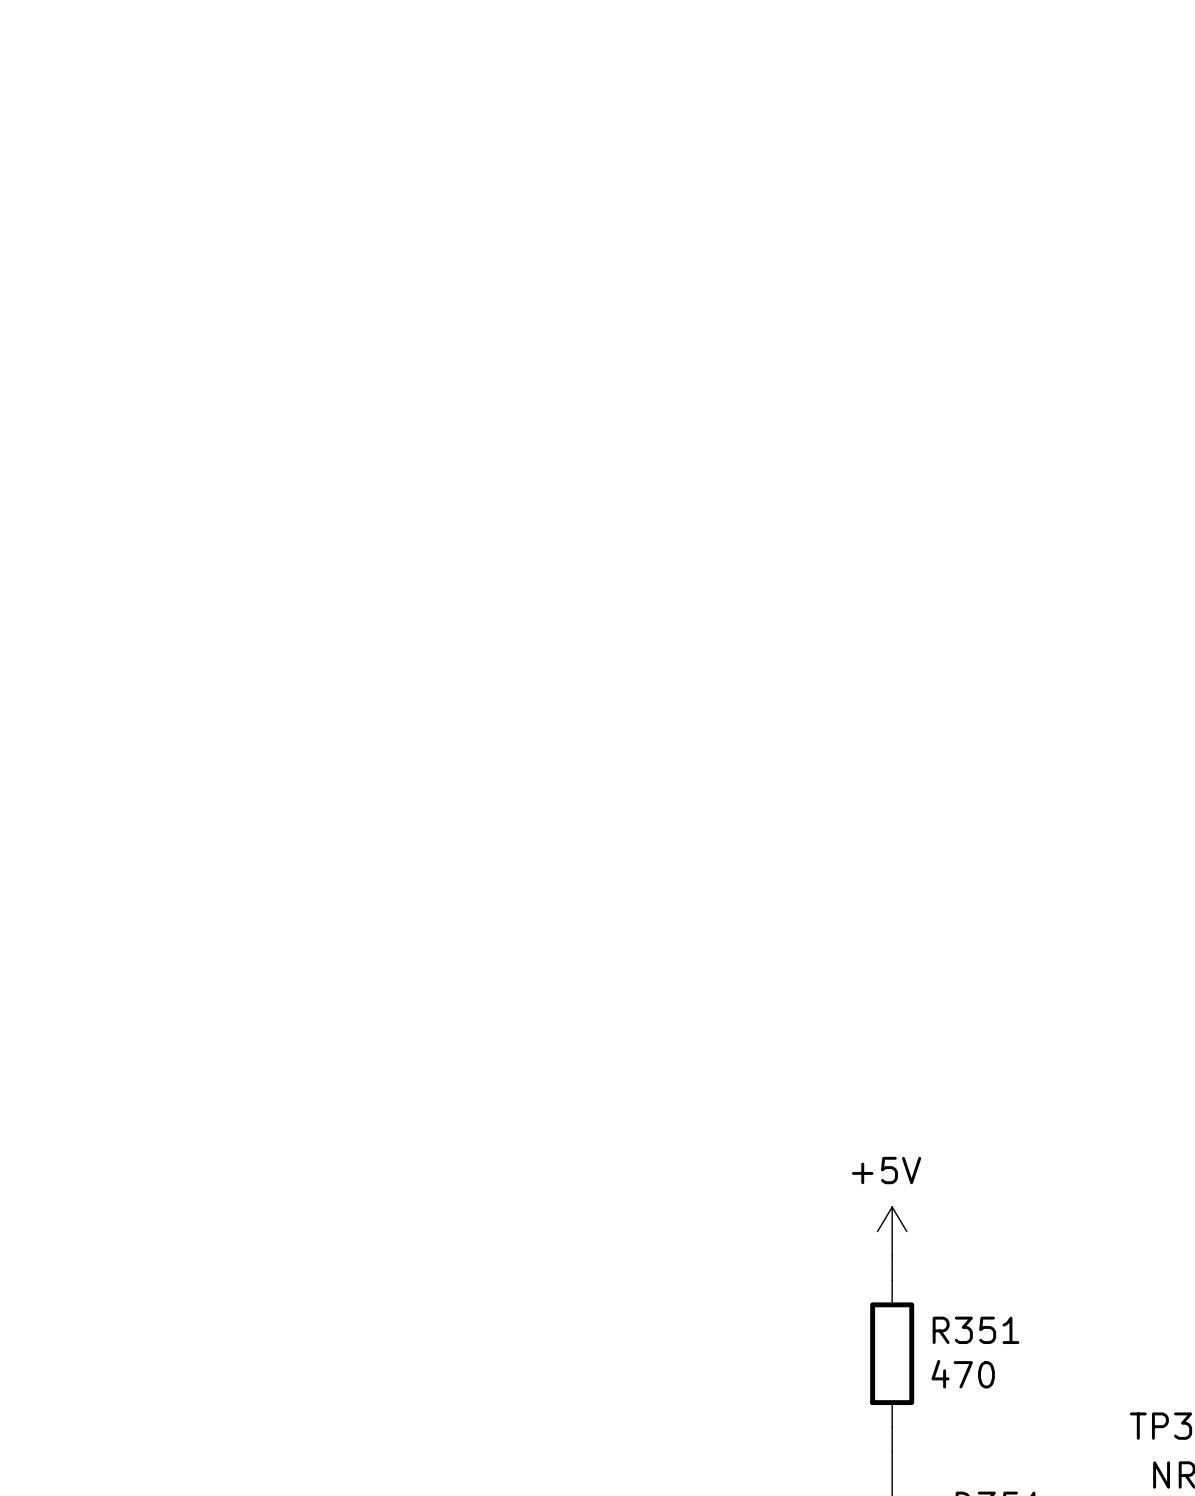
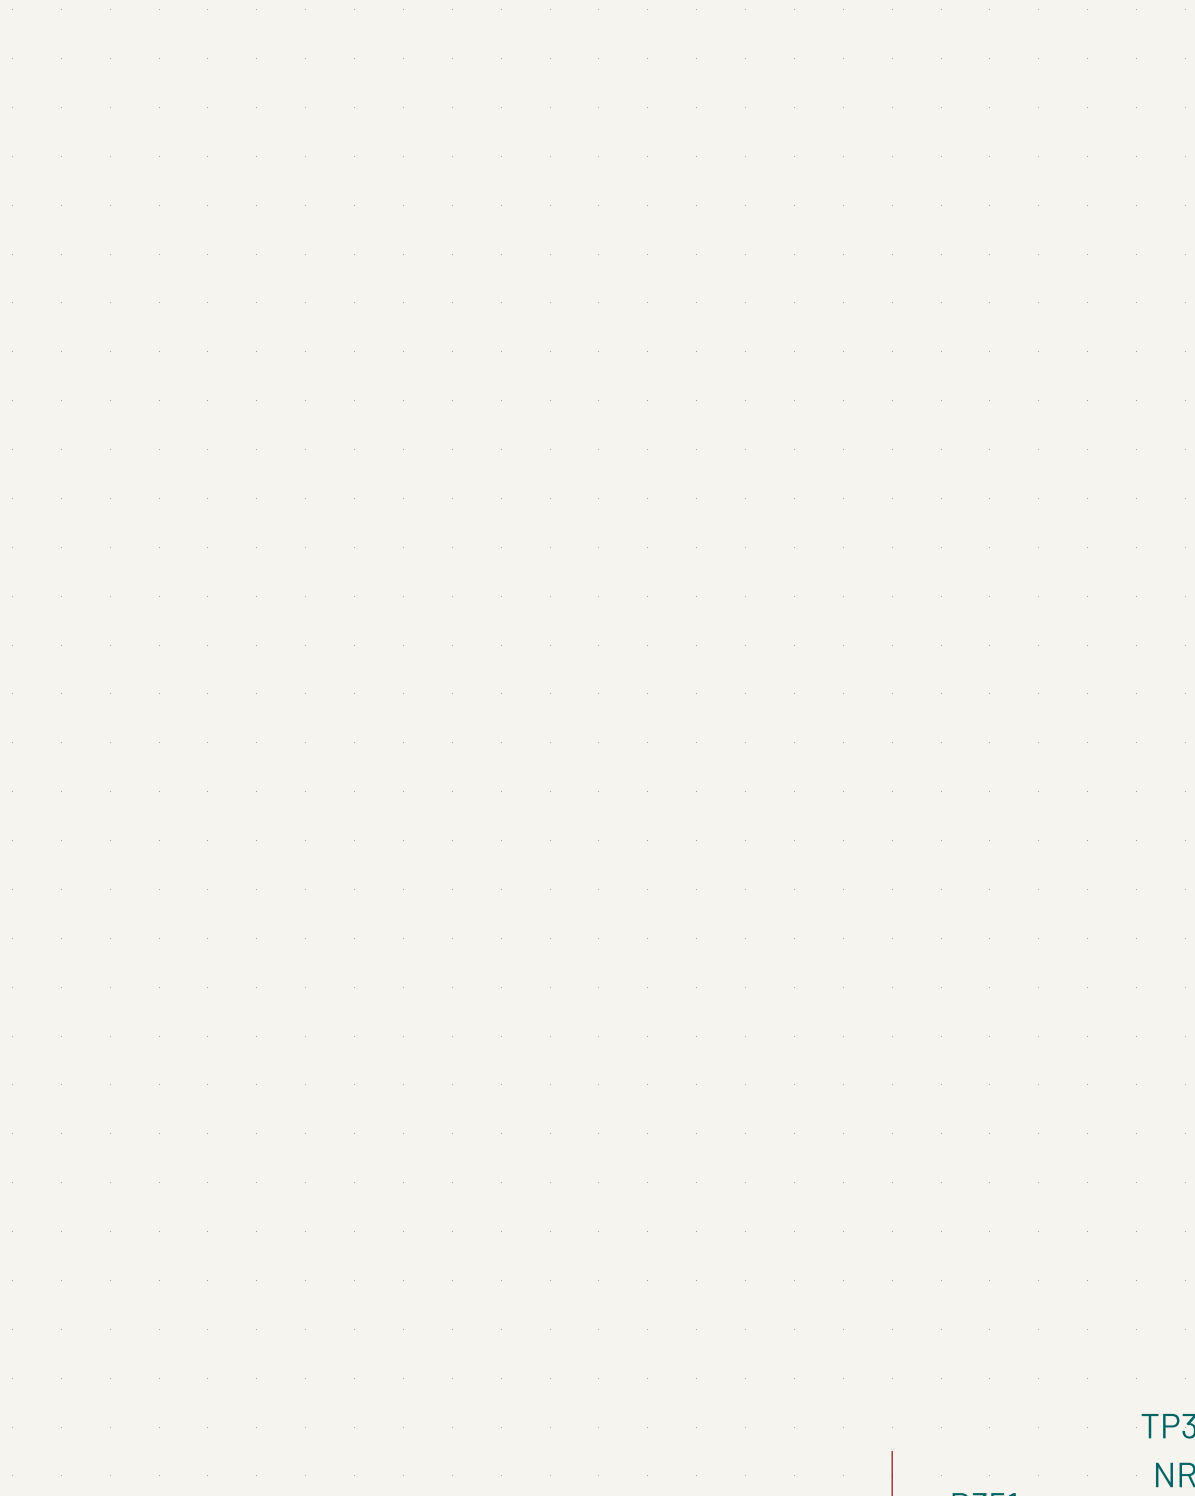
power symbol: +5V (892, 1231) -> none
wire: (892, 1255) (892, 1280) -> none
R351: 470 (892, 1353) -> none
wire: (892, 1427) (892, 1451) -> none

